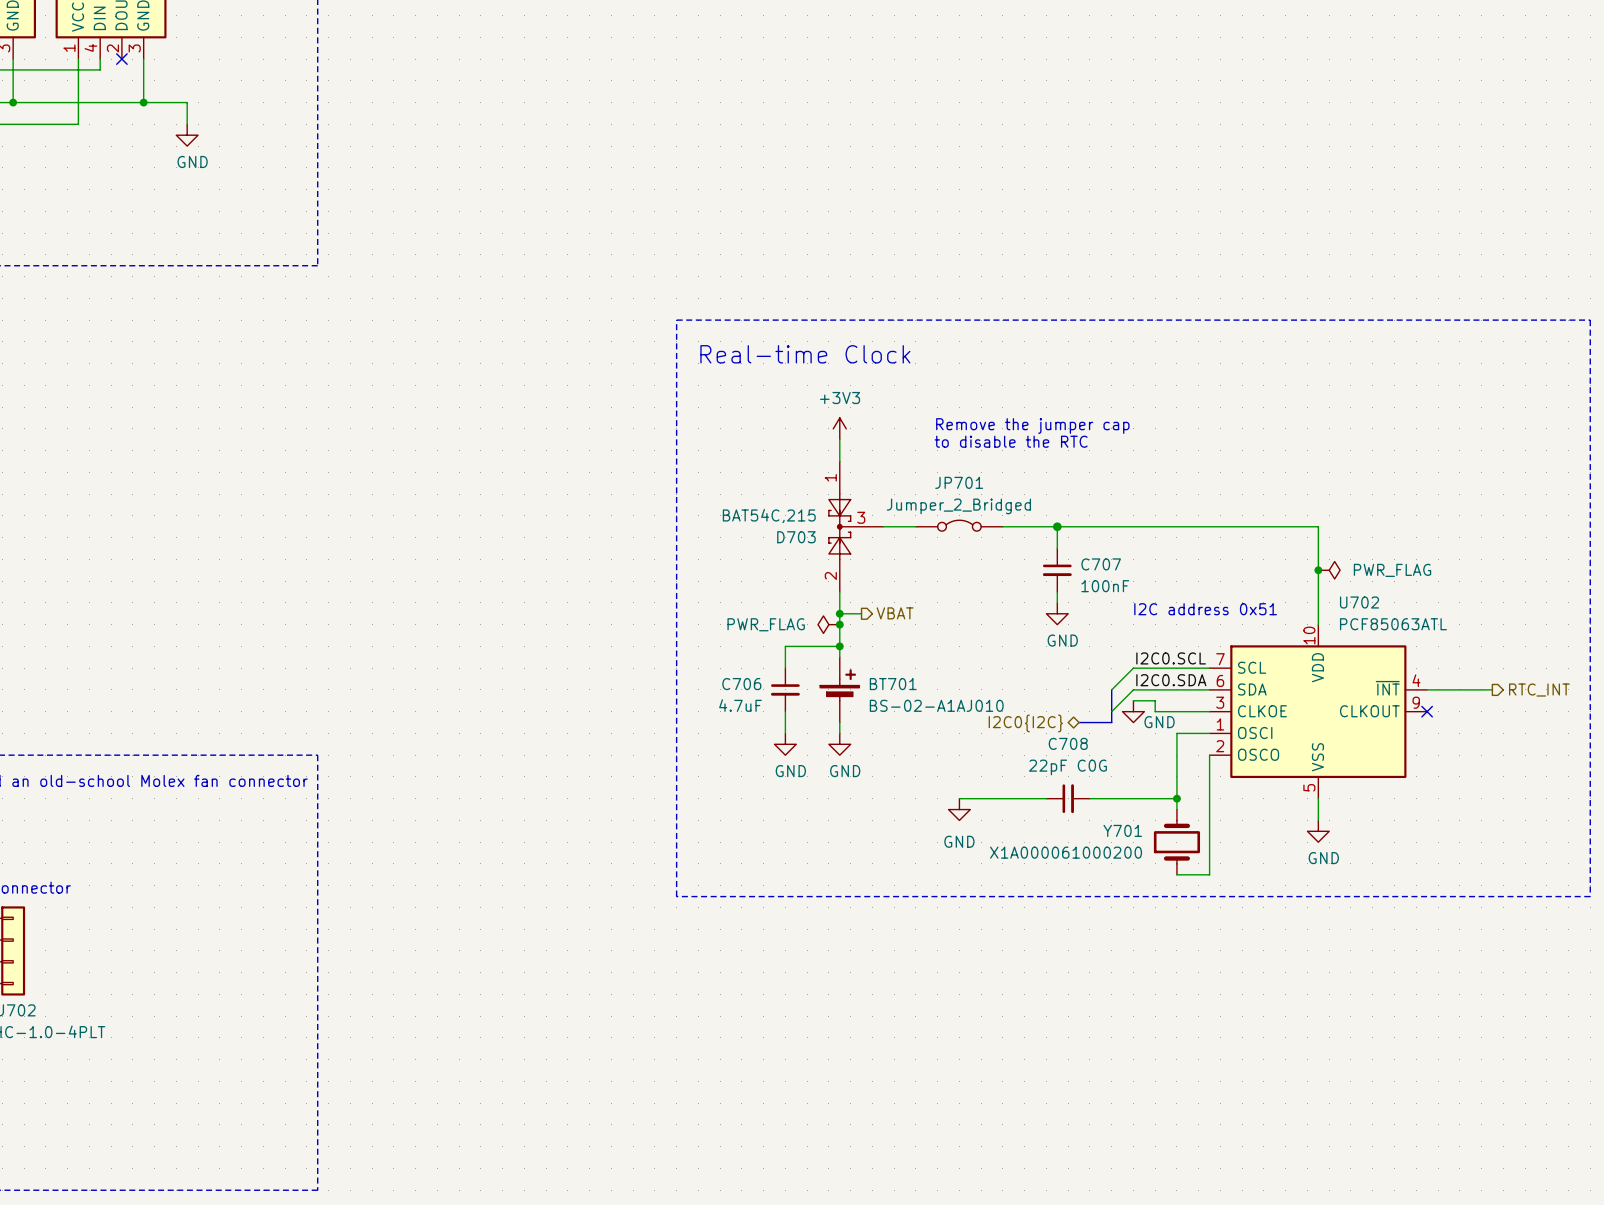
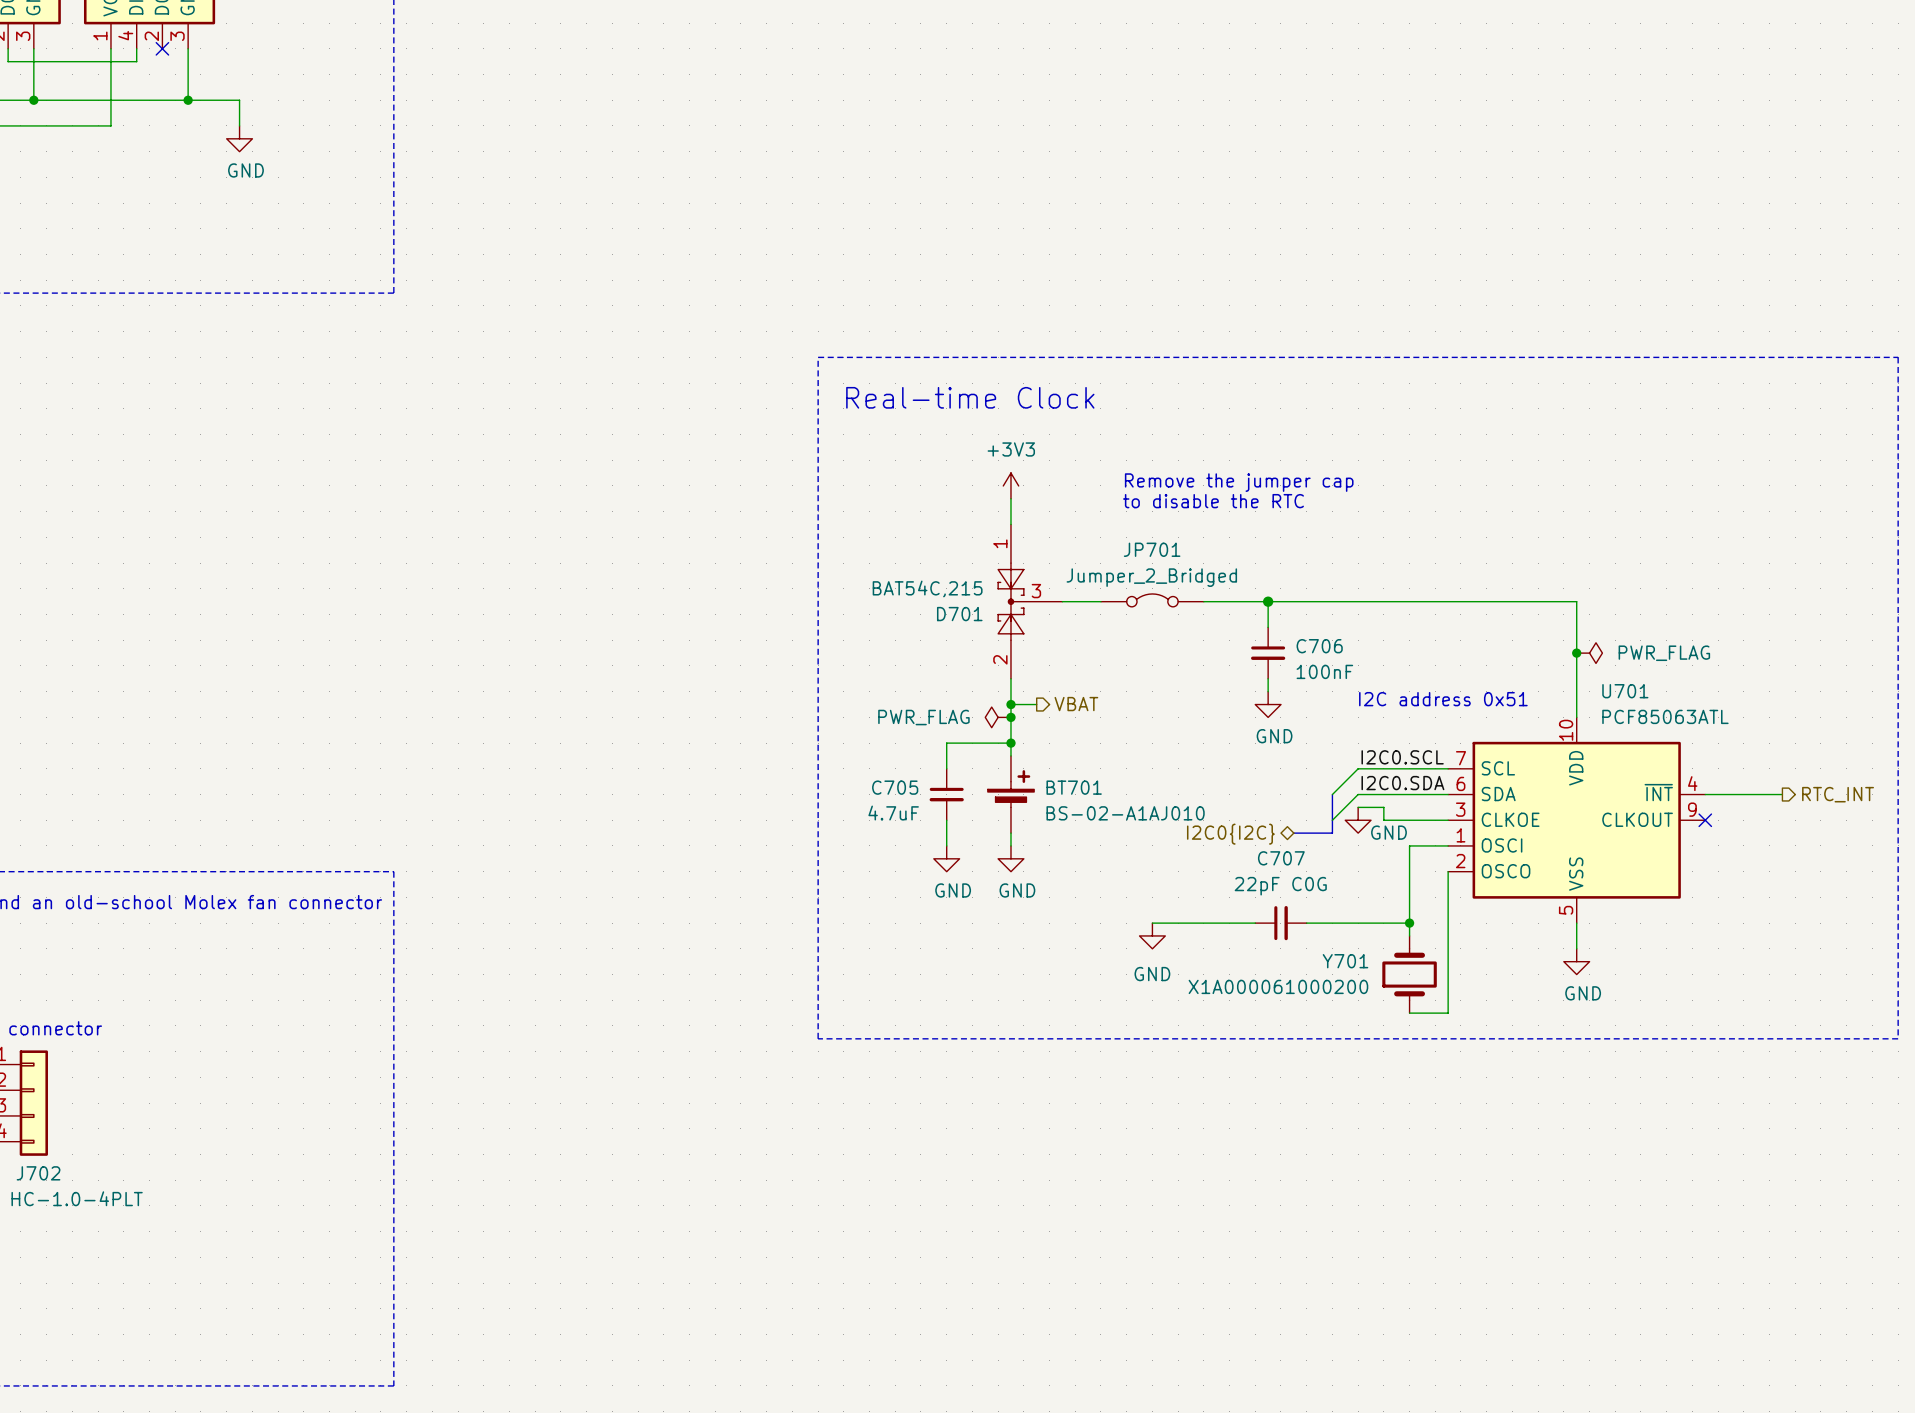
D703 name: D703 (796, 537) -> D701 (959, 614)
C707 name: C707 (1101, 564) -> C706 (1319, 646)
U702 name: U702 (1359, 602) -> U701 (1625, 691)
C706 name: C706 (741, 684) -> C705 (895, 787)
C708 name: C708 (1068, 743) -> C707 (1281, 858)

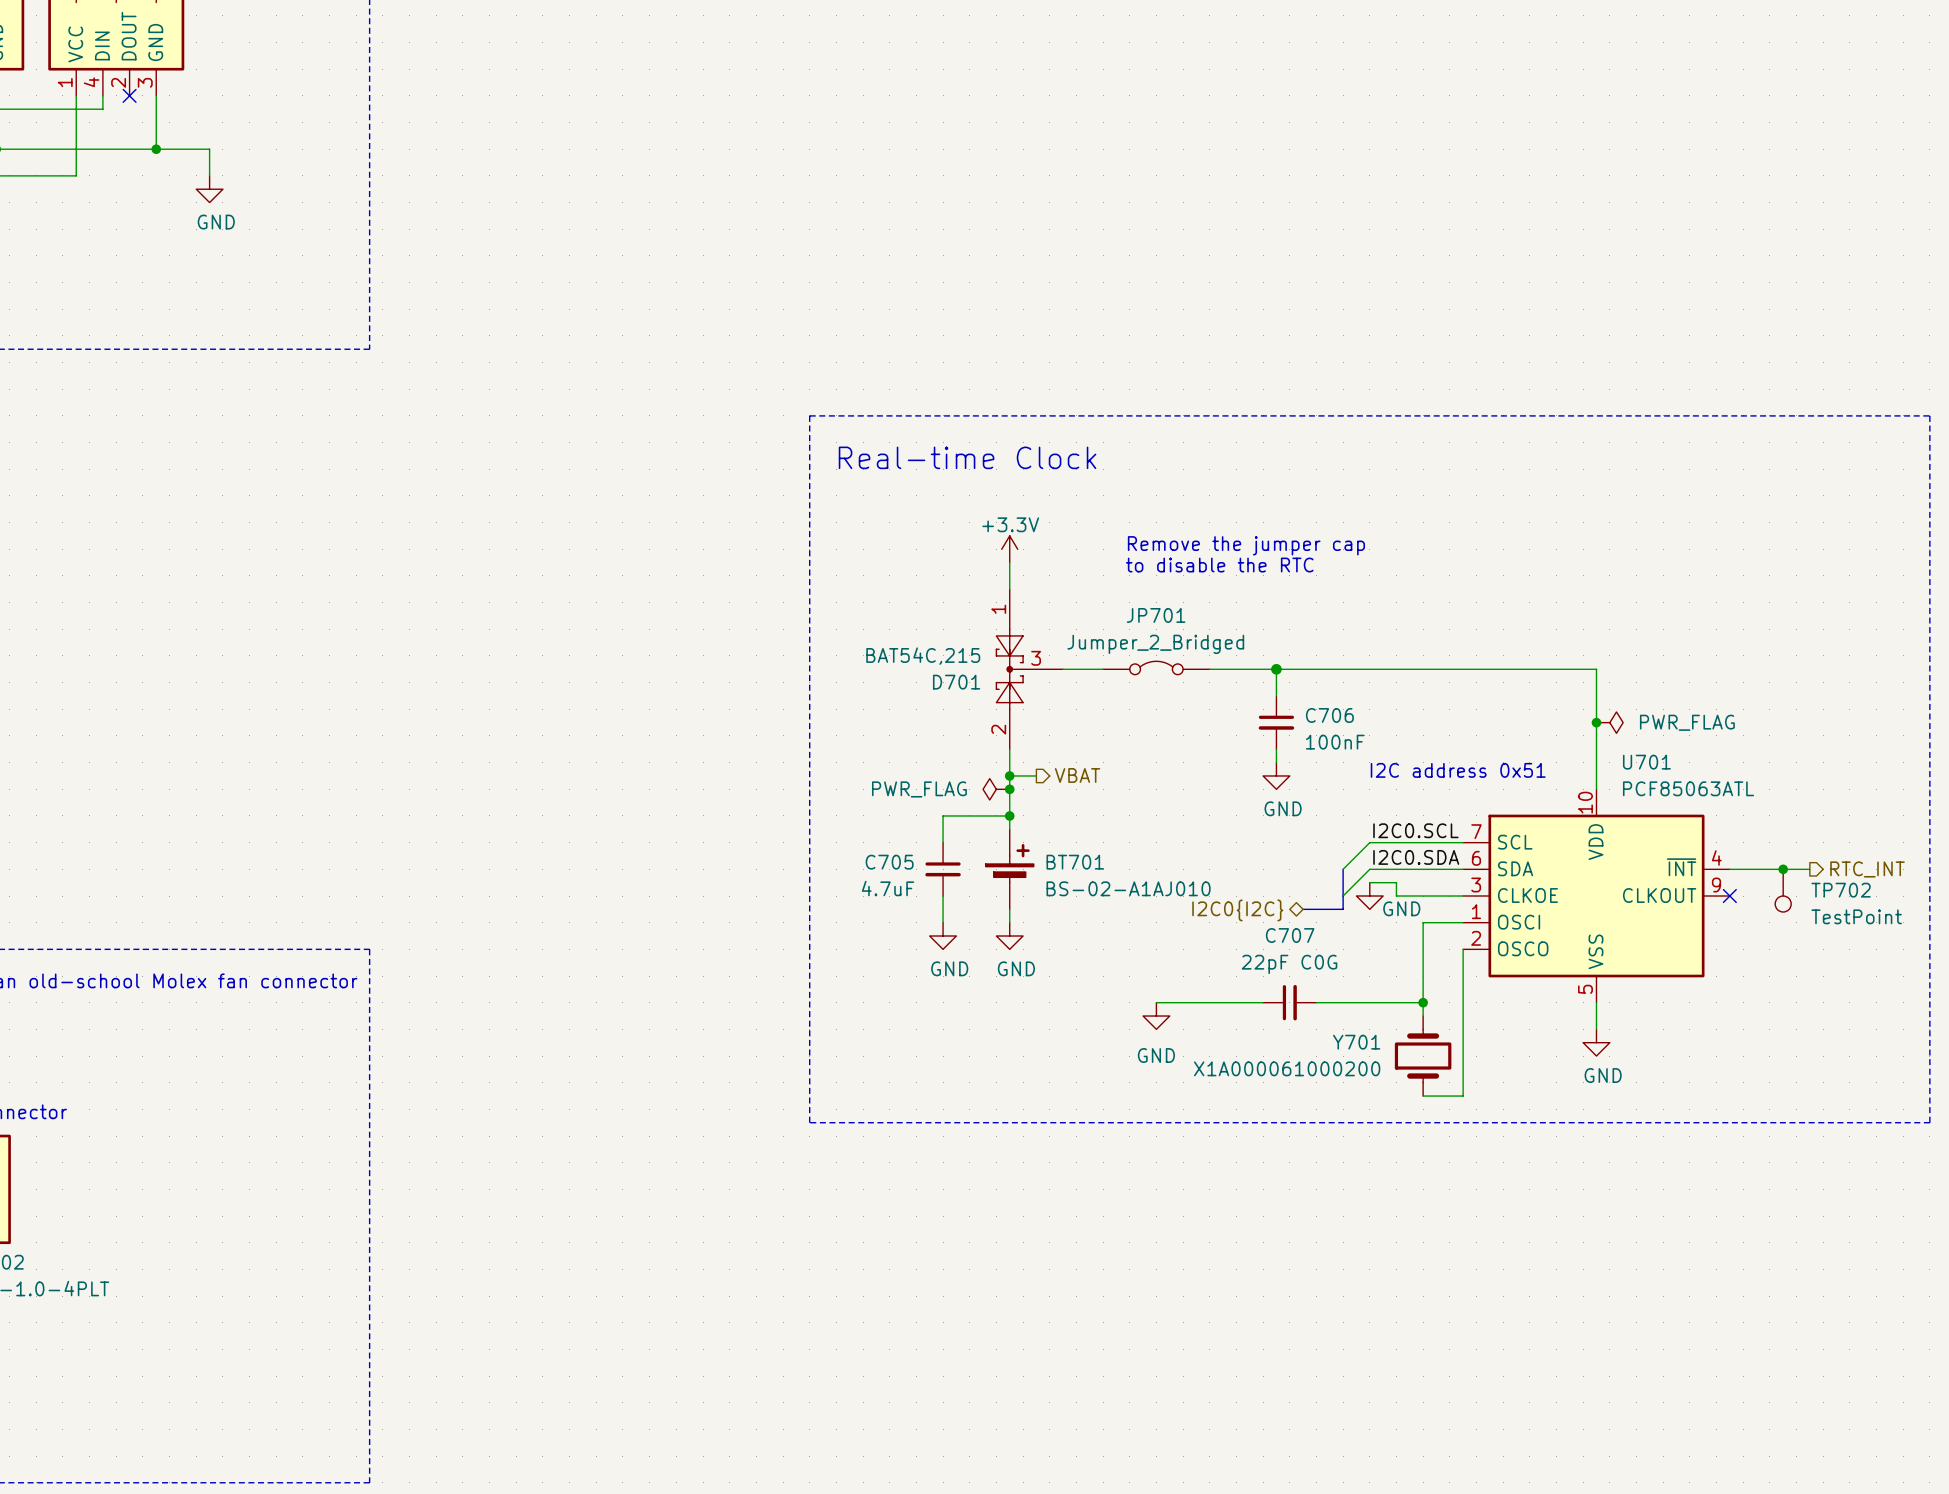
power symbol: +3V3 (1010, 485) -> +3.3V (1009, 549)
junction: none -> (1783, 869)
TP702: none -> TestPoint (1783, 890)

